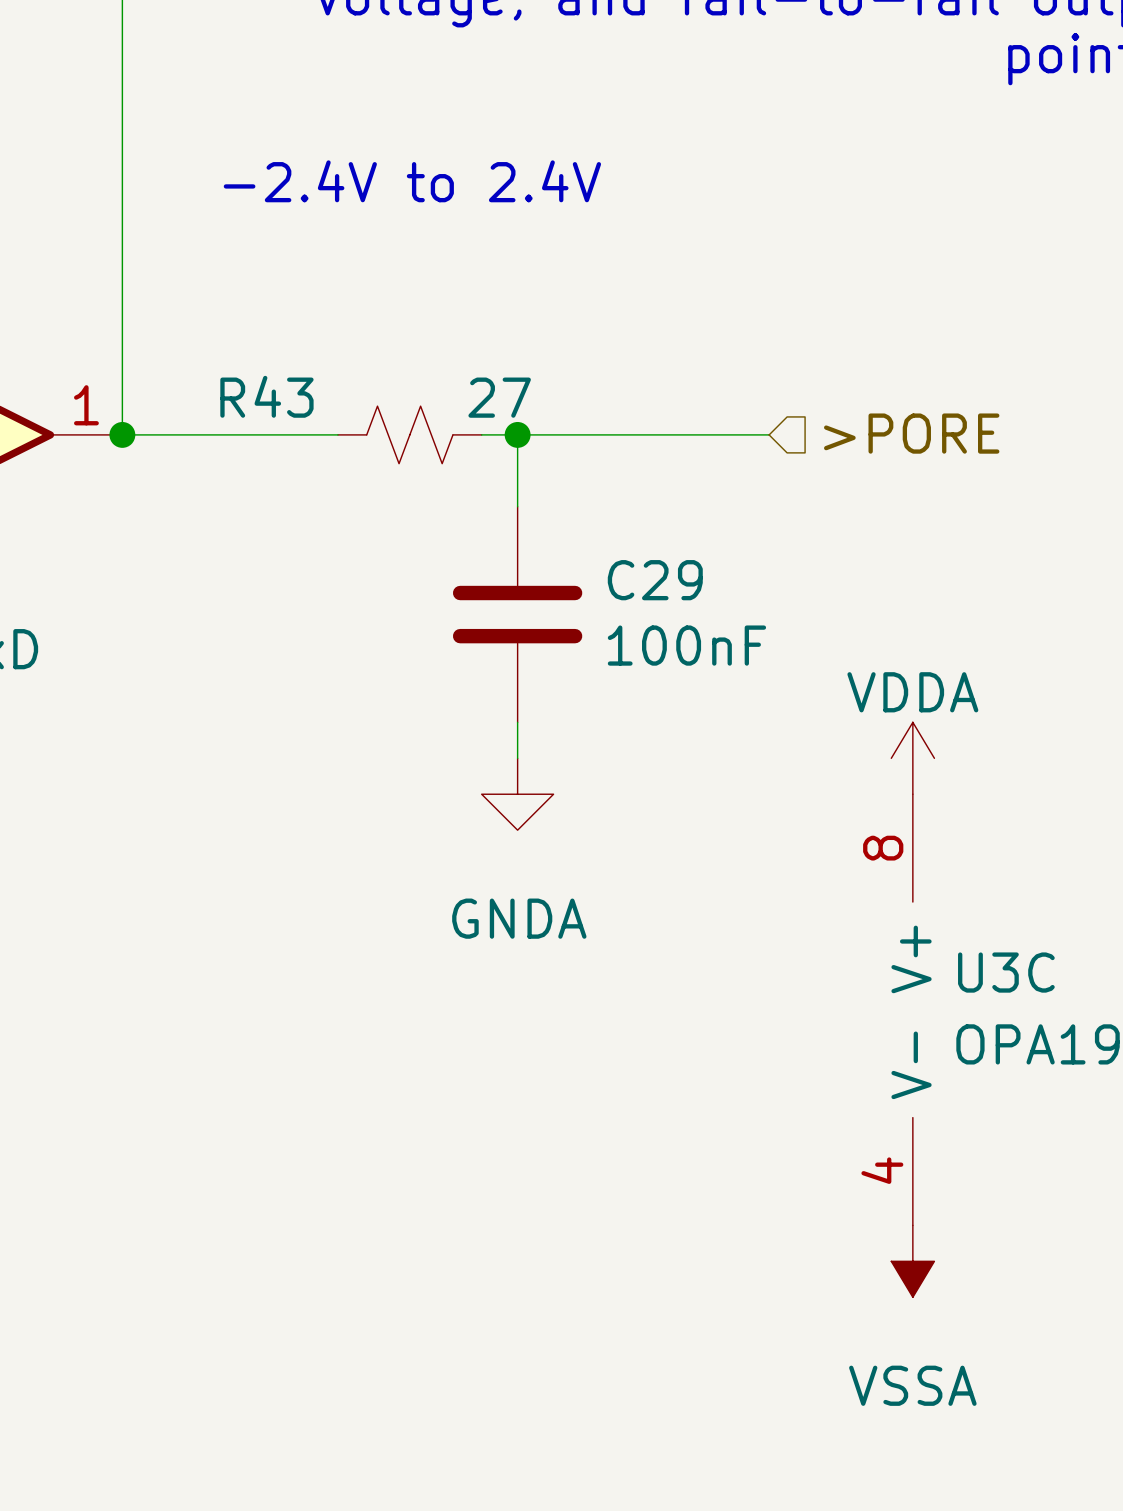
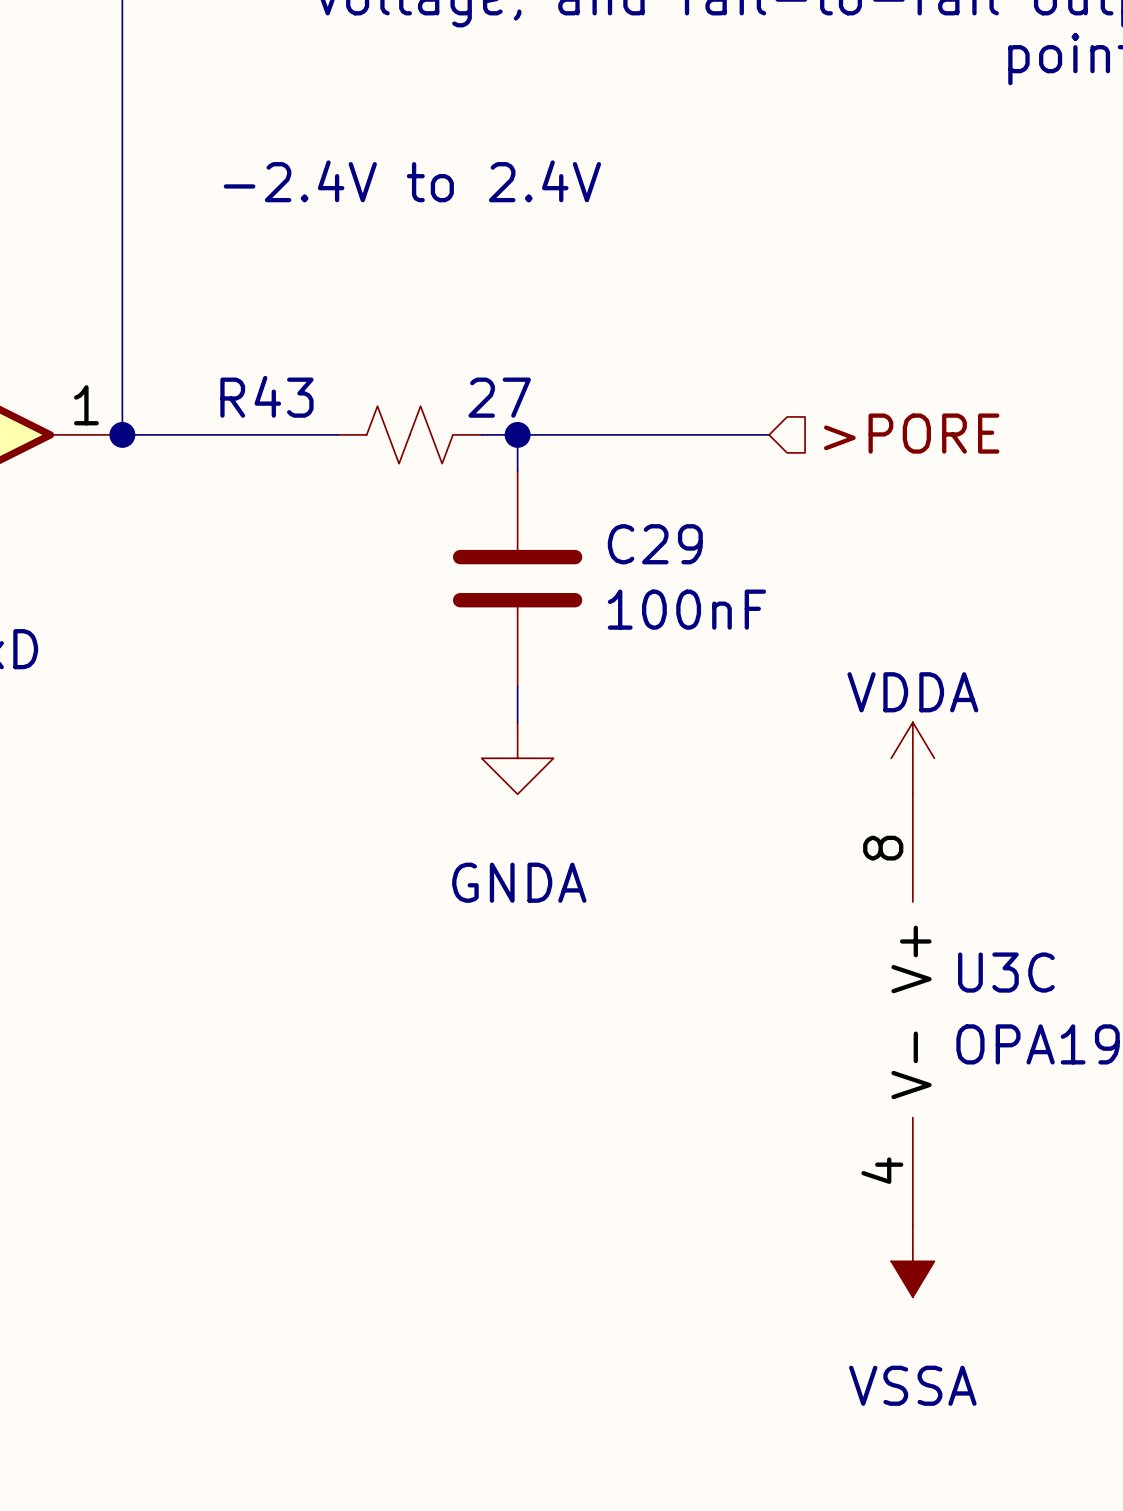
C29 position: (517, 614) -> (517, 578)
power symbol position: GNDA (517, 794) -> GNDA (517, 758)

